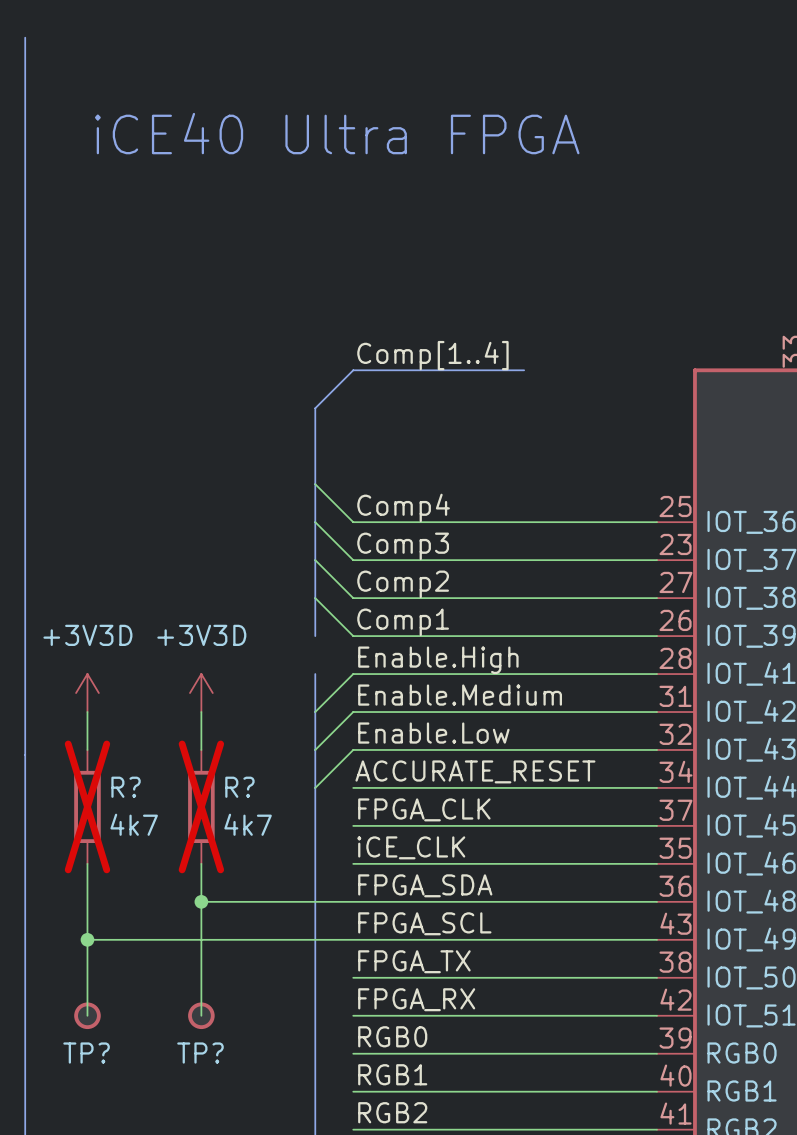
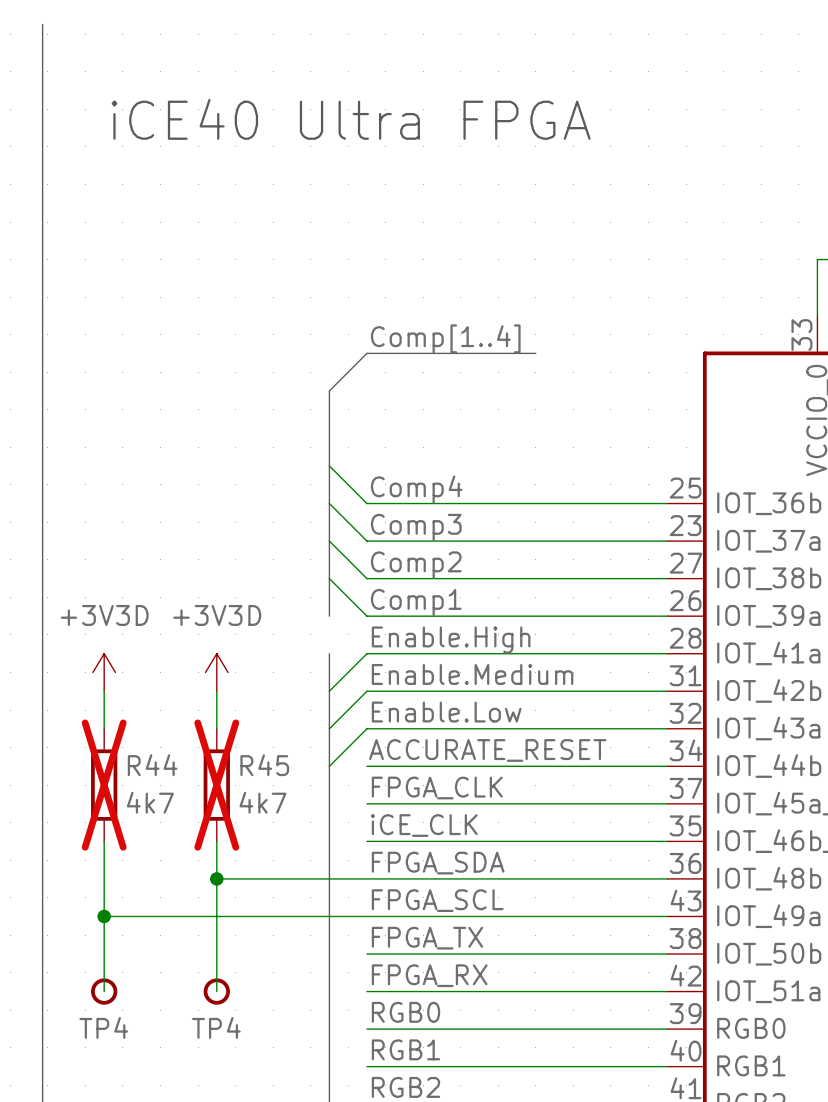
R? name: R? (126, 787) -> R44 (152, 765)
R? name: R? (239, 787) -> R45 (264, 765)
TP? name: TP? (86, 1053) -> TP4 (103, 1027)
TP? name: TP? (200, 1053) -> TP4 (216, 1027)

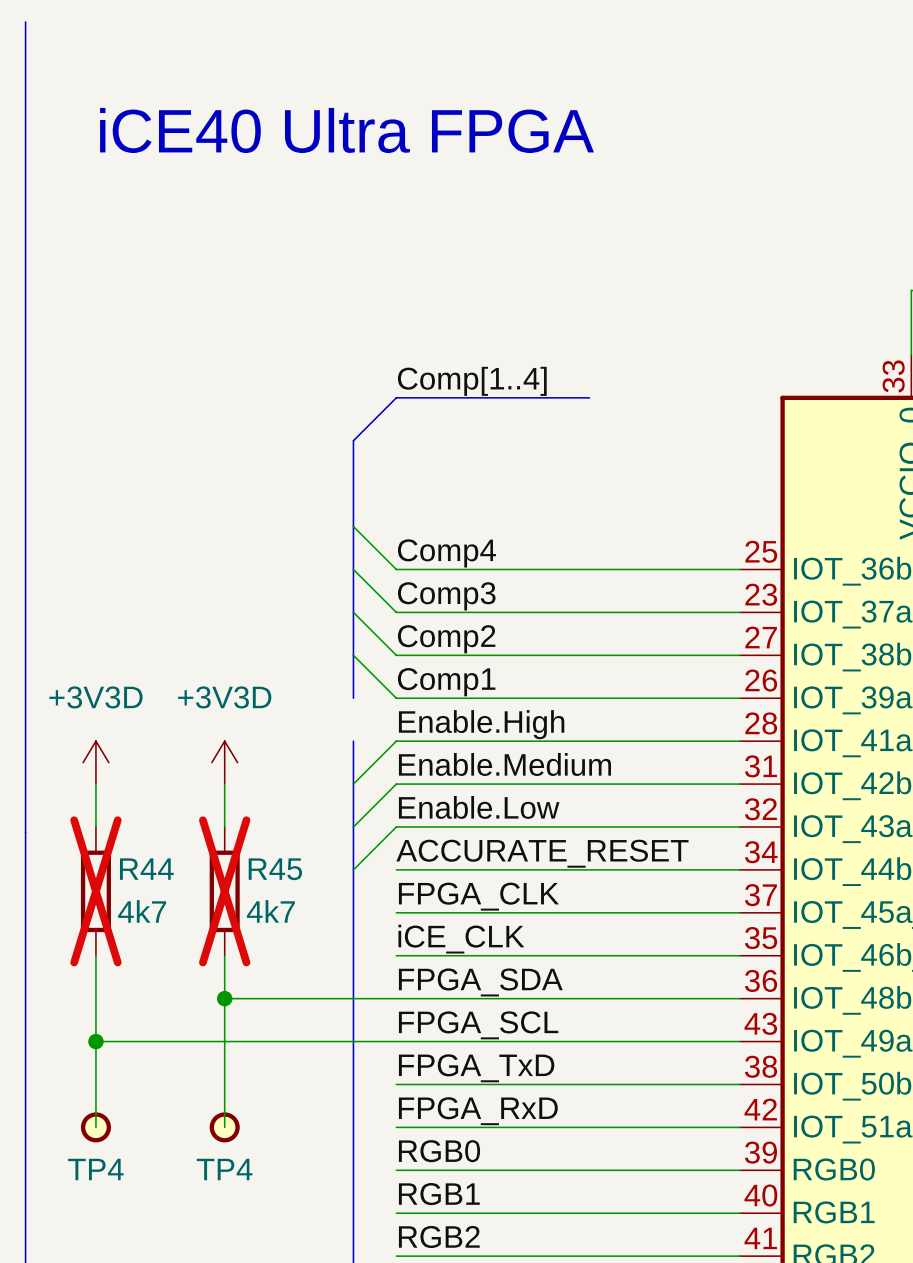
label: FPGA_TX (427, 938) -> FPGA_TxD (476, 1068)
label: FPGA_RX (429, 975) -> FPGA_RxD (478, 1111)

